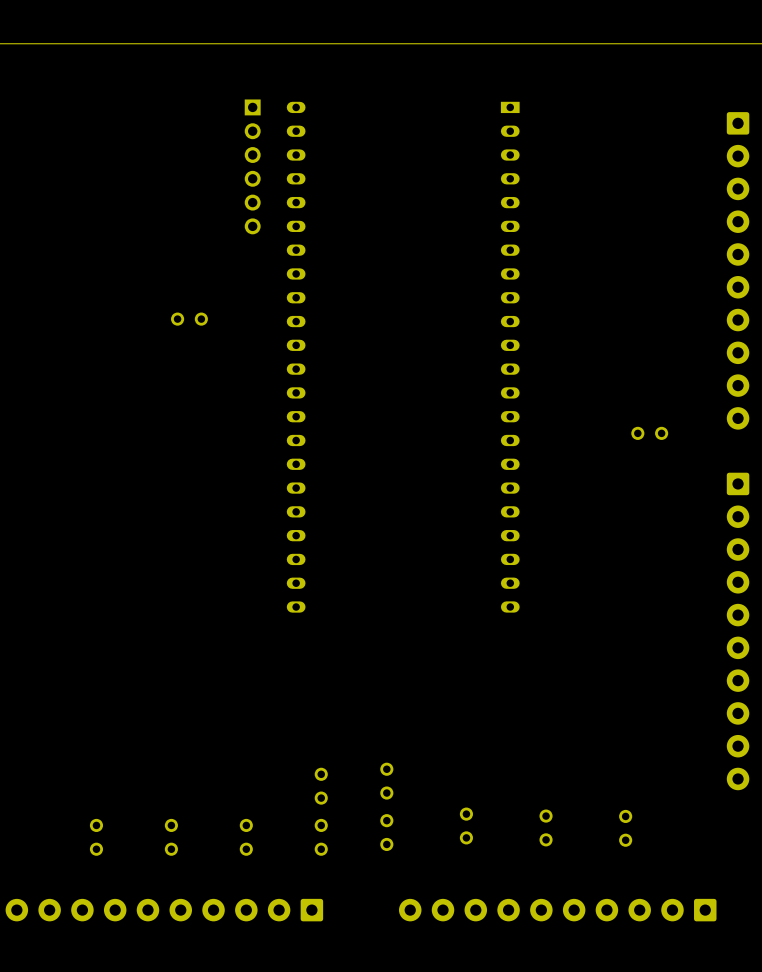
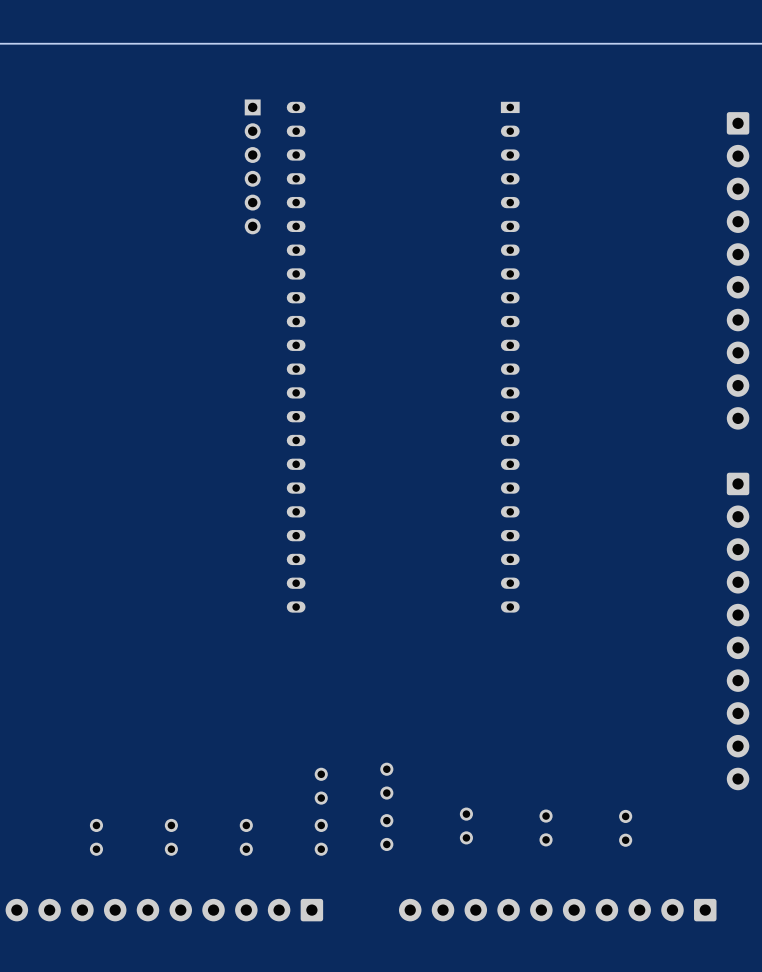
part: (189, 319) -> none
part: (649, 433) -> none

